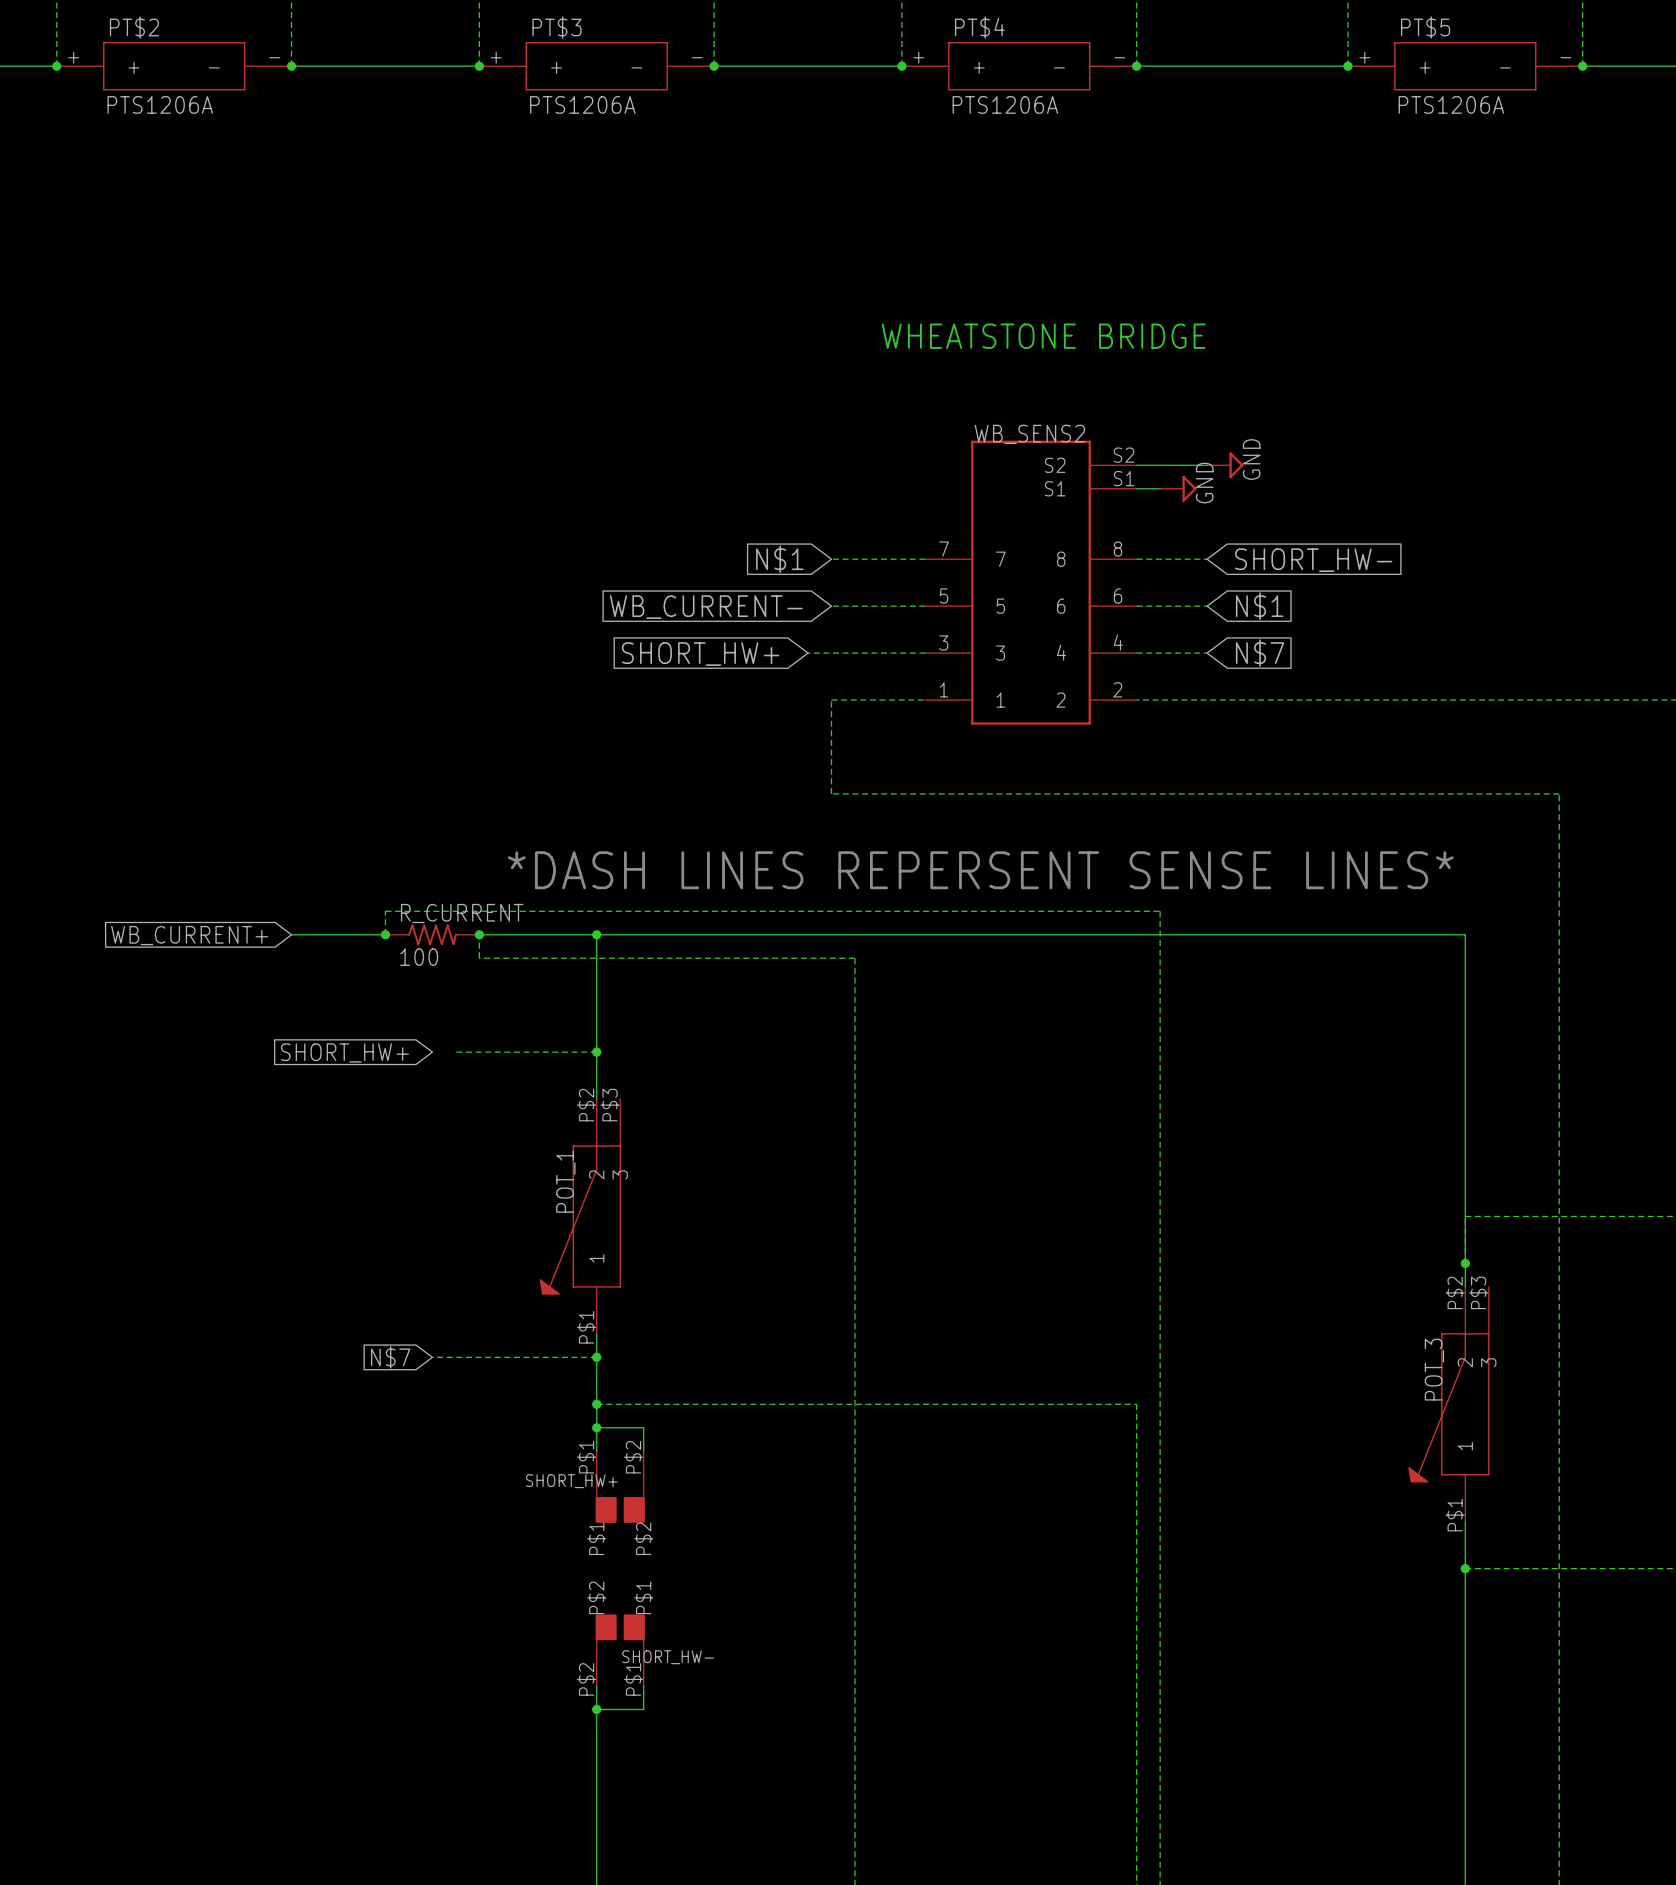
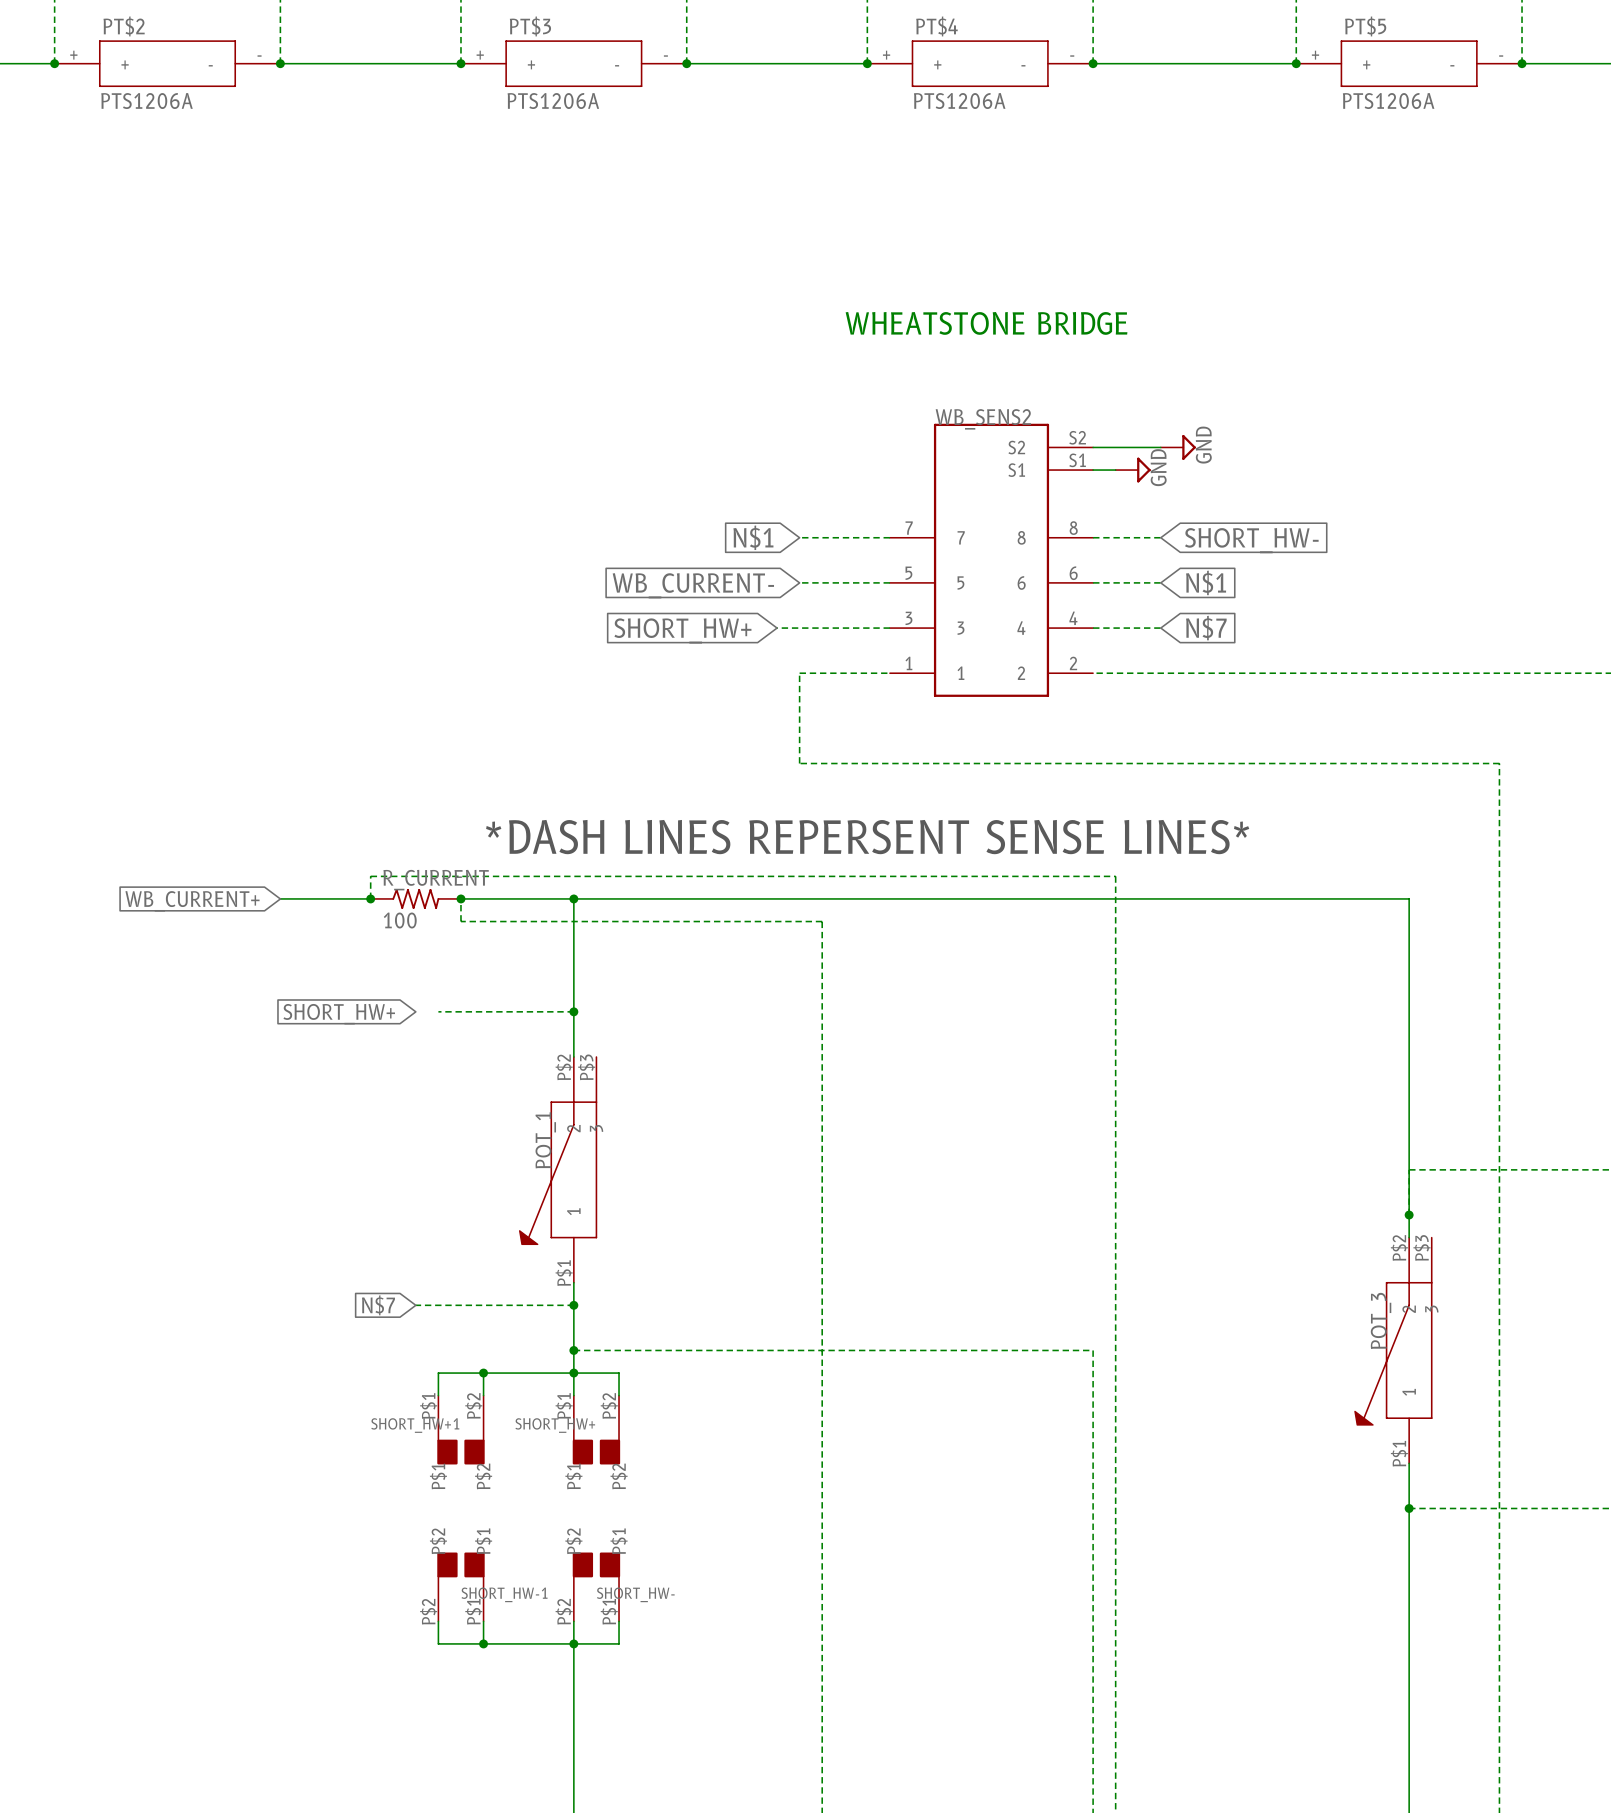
wire: none -> (483, 1373) (483, 1395)
junction: none -> (483, 1373)
wire: none -> (573, 1373) (438, 1373) (438, 1395)
SHORT_HW+1: none -> (460, 1430)
SHORT_HW-1: none -> (460, 1586)
wire: none -> (438, 1621) (438, 1643) (573, 1643)
wire: none -> (483, 1621) (483, 1643)
junction: none -> (483, 1643)

